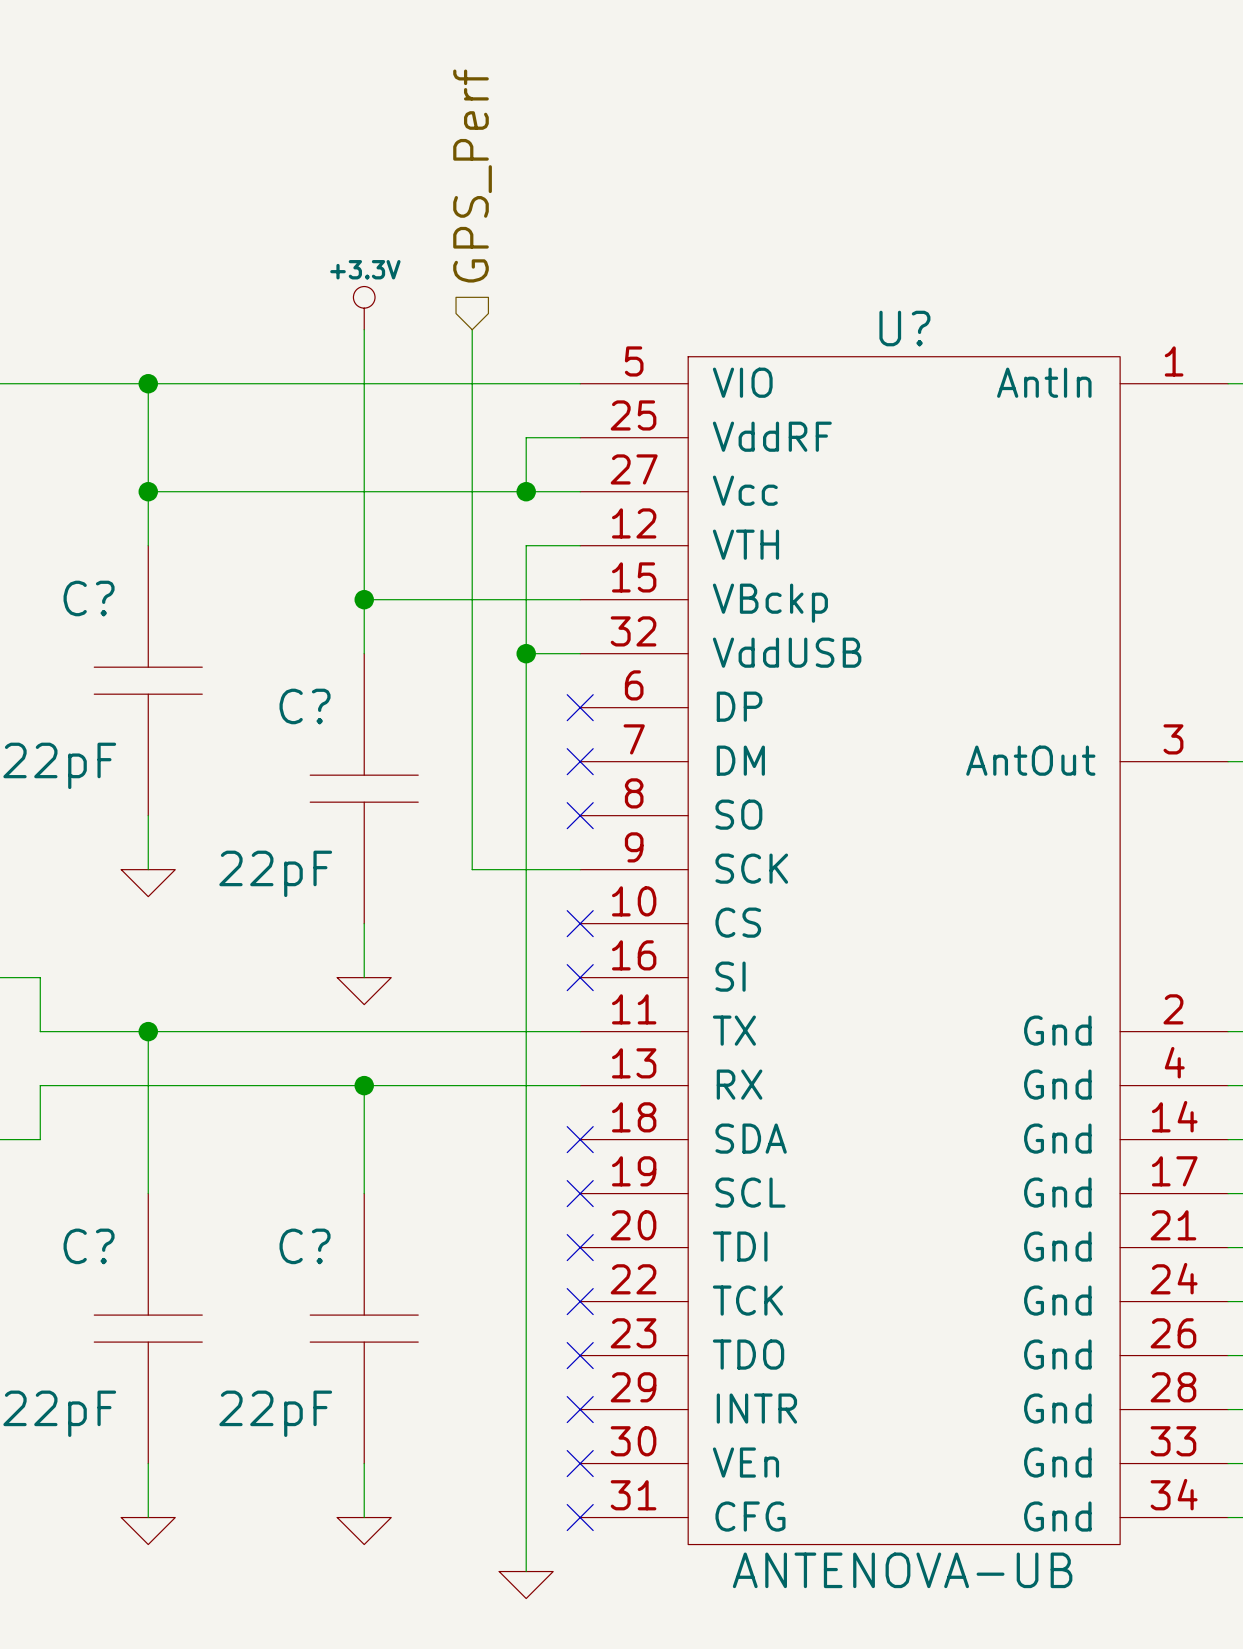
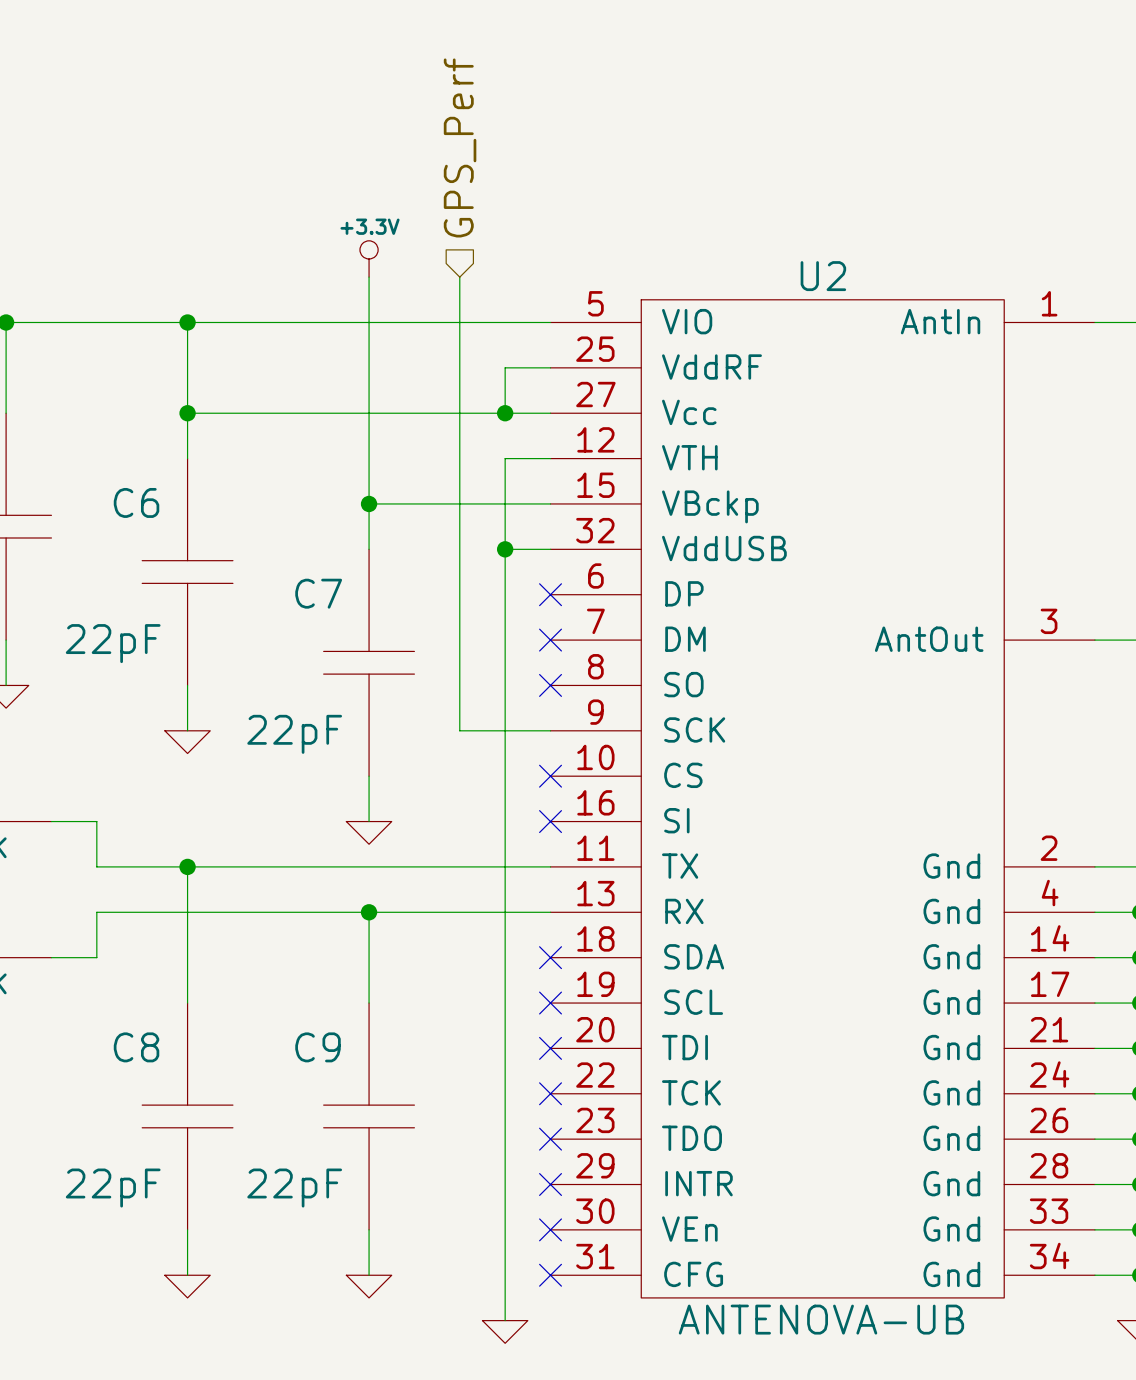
U? name: U? (904, 328) -> U2 (823, 276)
C? name: C? (89, 598) -> C6 (136, 502)
C? name: C? (305, 706) -> C7 (318, 593)
C? name: C? (89, 1246) -> C8 (136, 1047)
C? name: C? (305, 1246) -> C9 (317, 1047)

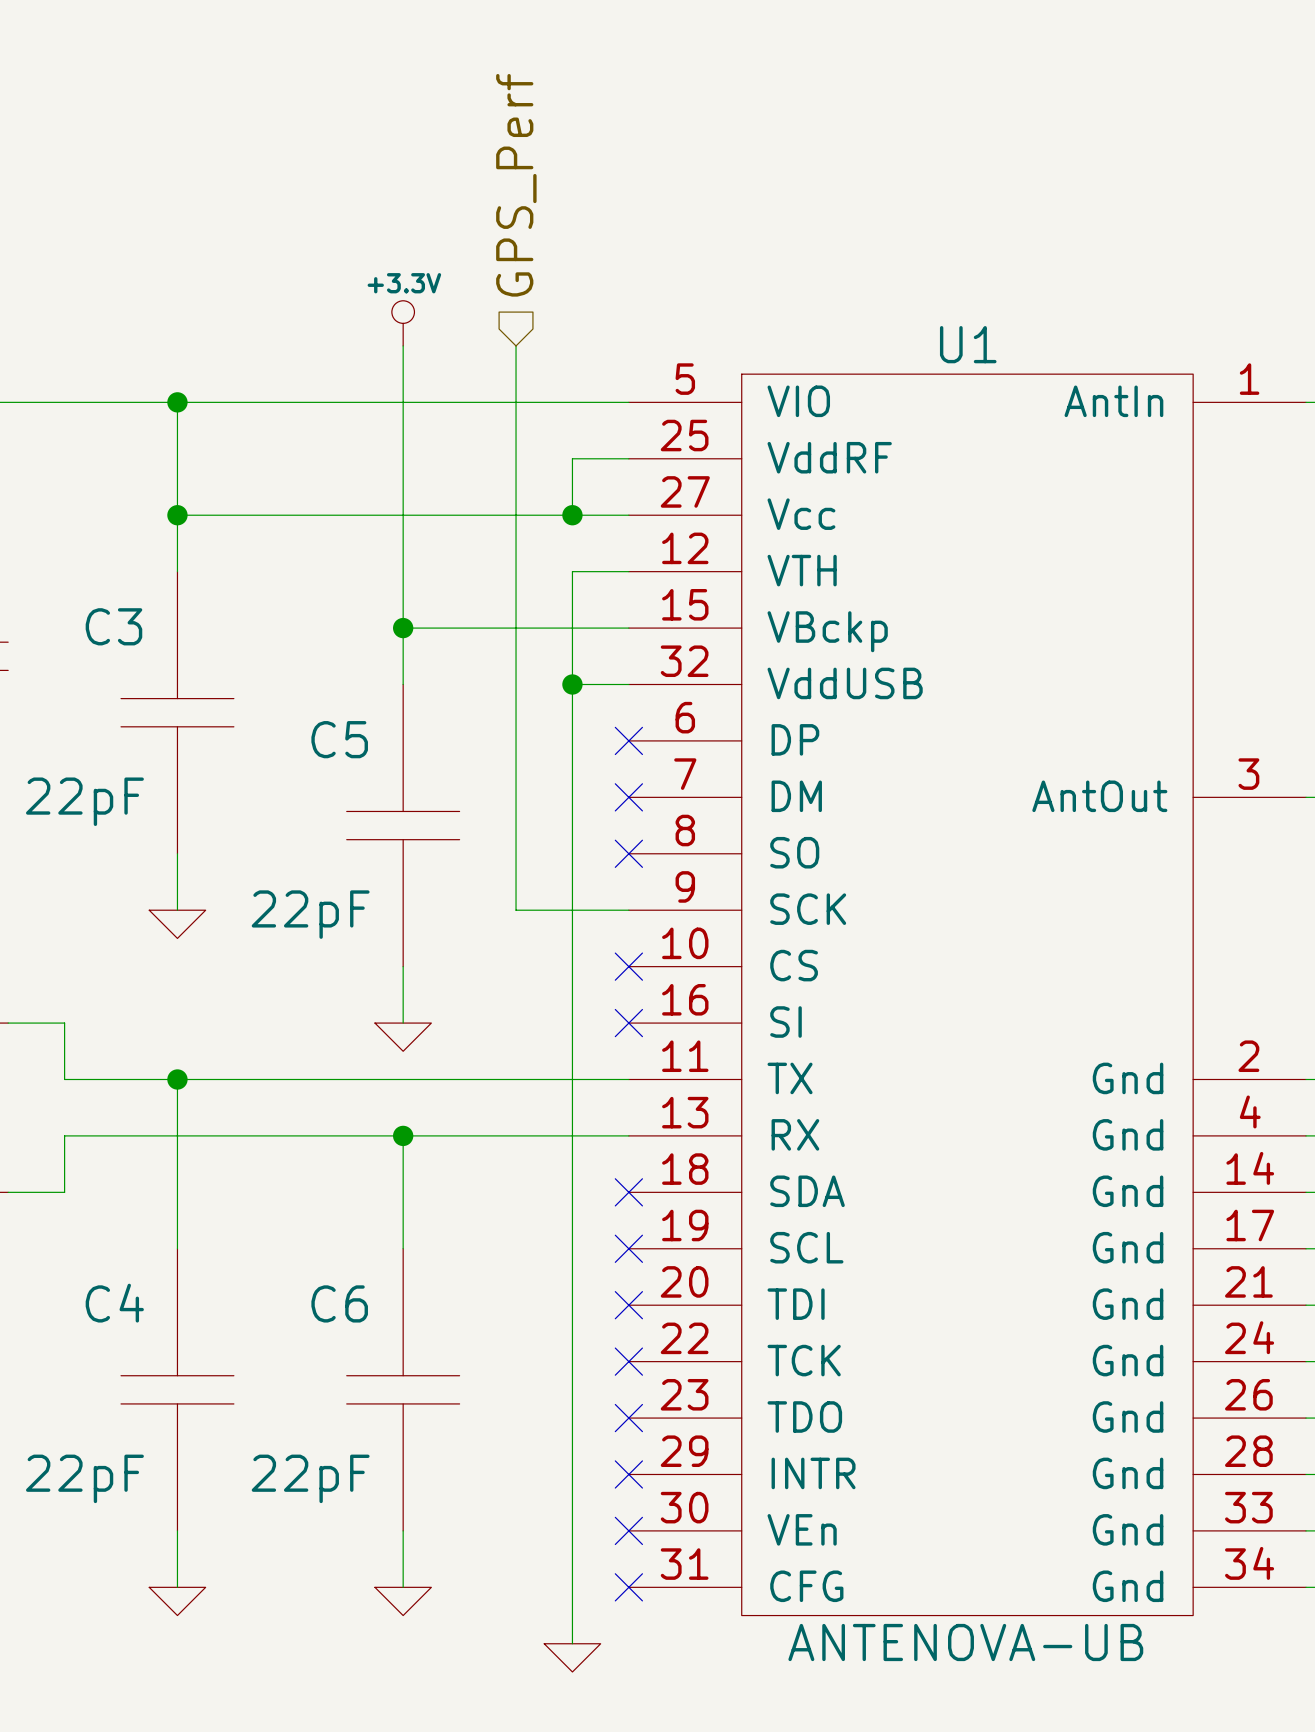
U2 name: U2 (823, 276) -> U1 (968, 344)
C6 name: C6 (136, 502) -> C3 (113, 626)
C7 name: C7 (318, 593) -> C5 (339, 739)
C8 name: C8 (136, 1047) -> C4 (114, 1303)
C9 name: C9 (317, 1047) -> C6 (339, 1303)

